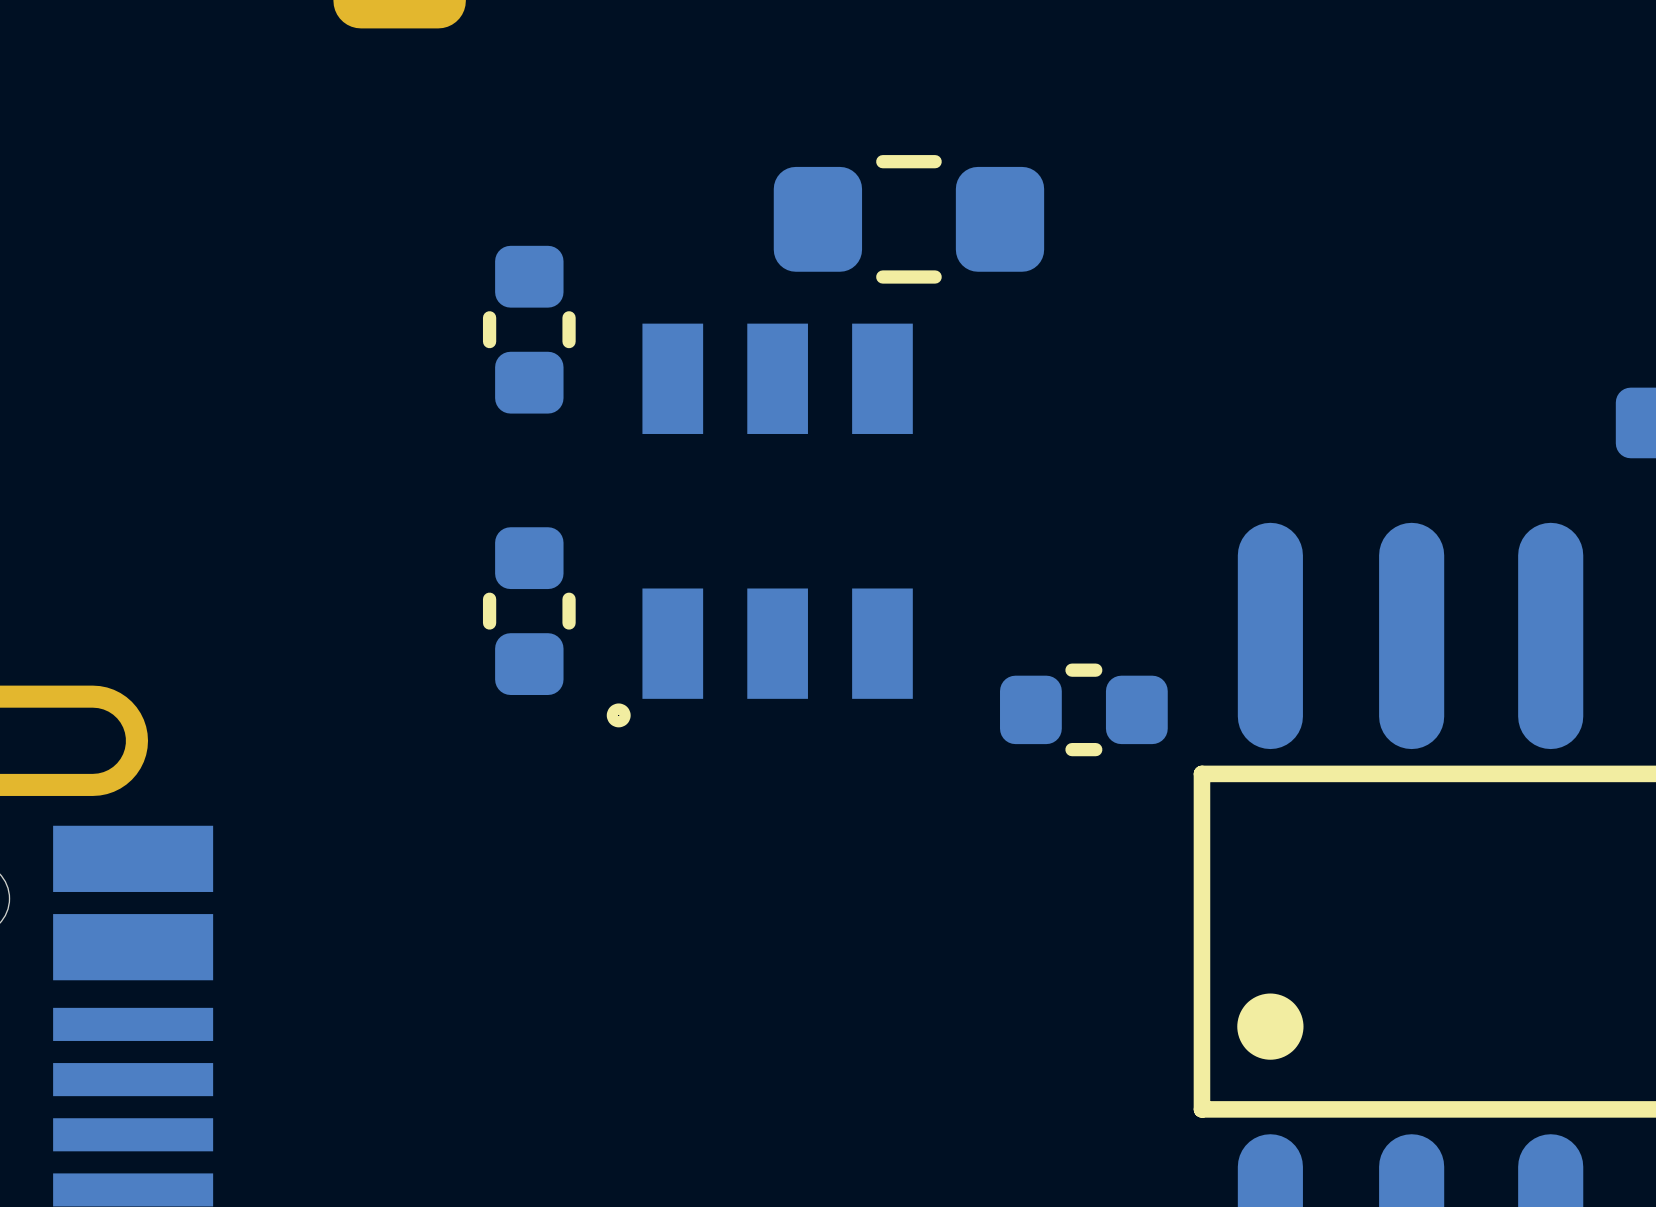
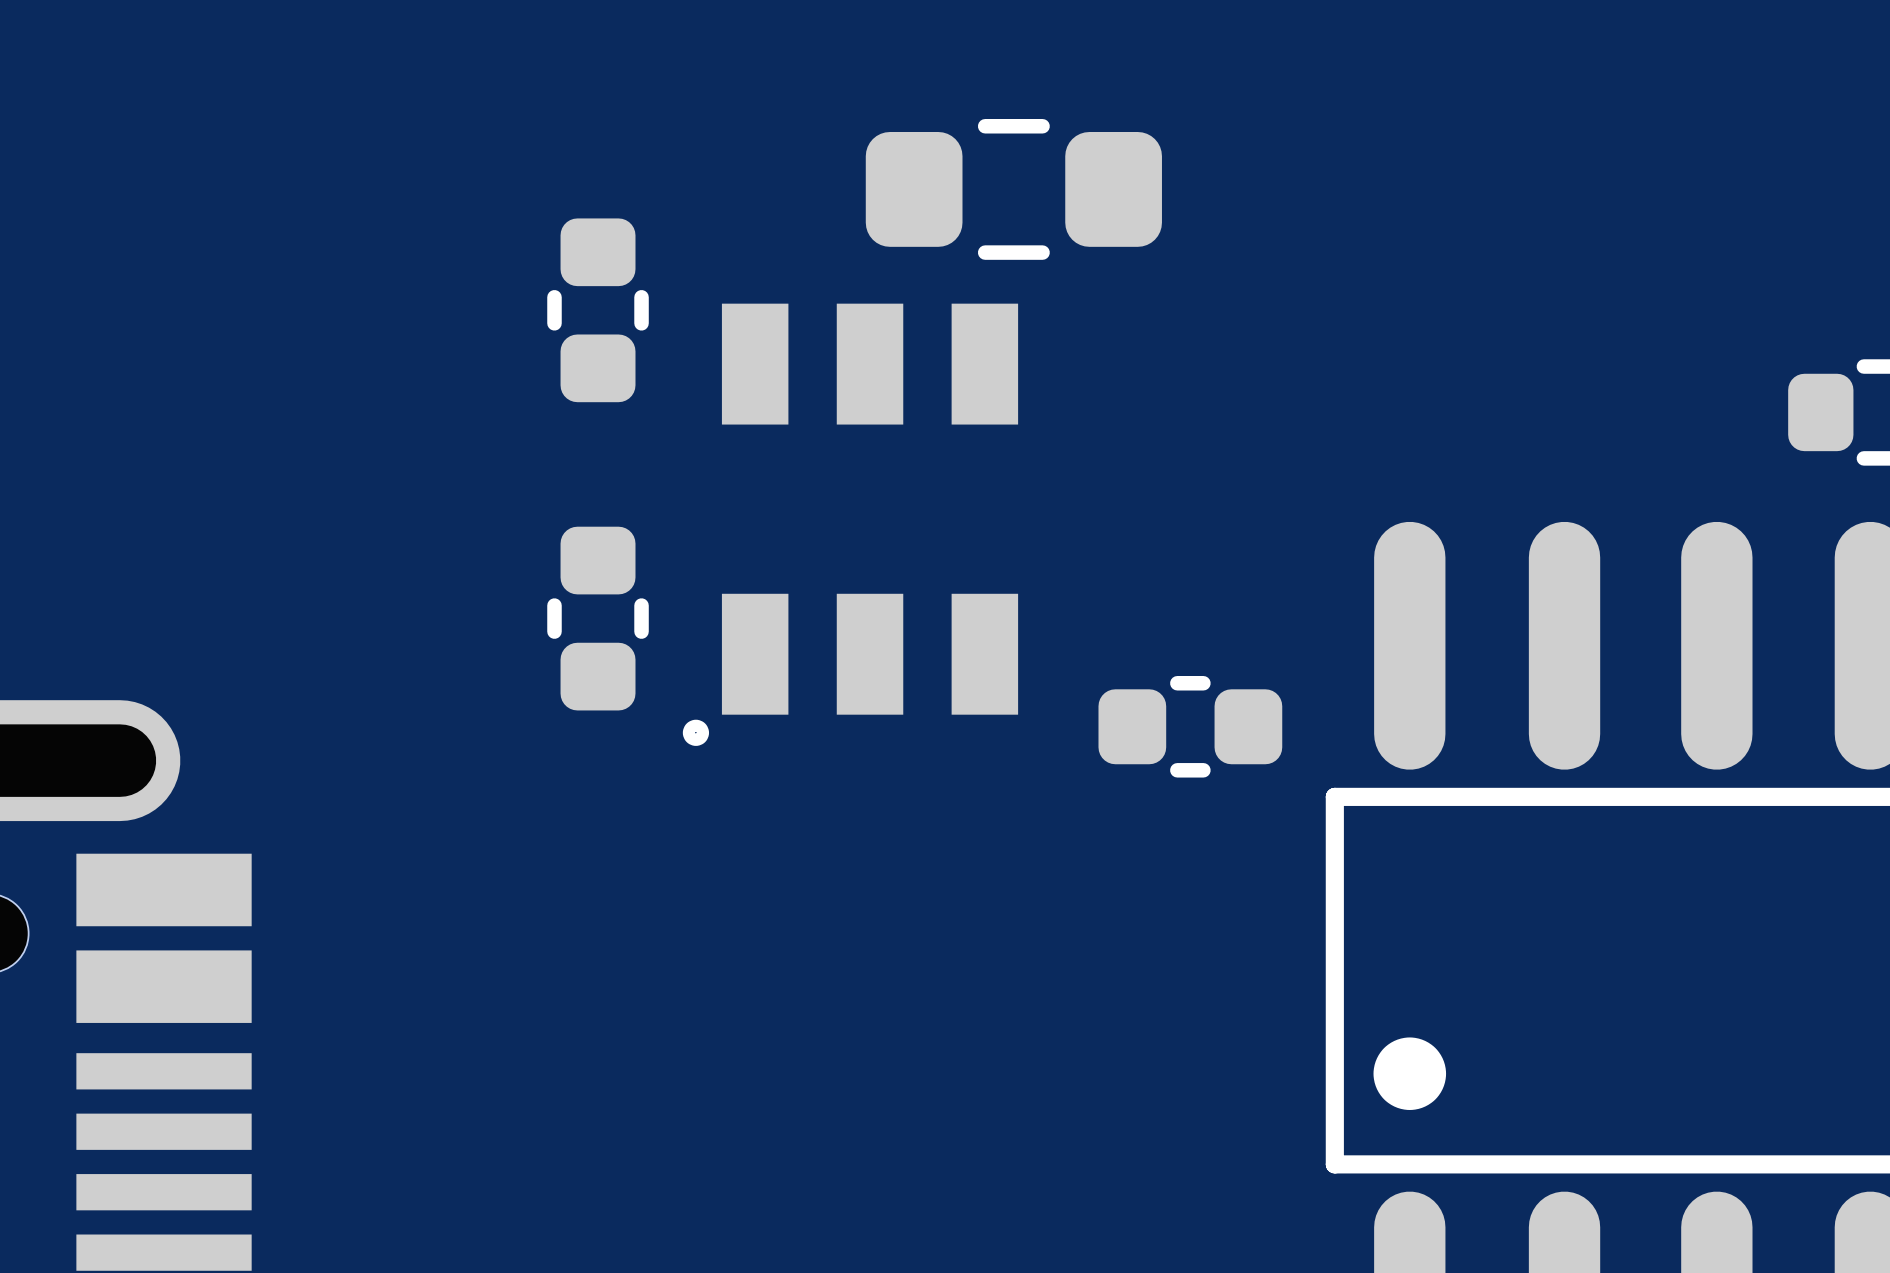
part position: (1083, 709) -> (1190, 726)

